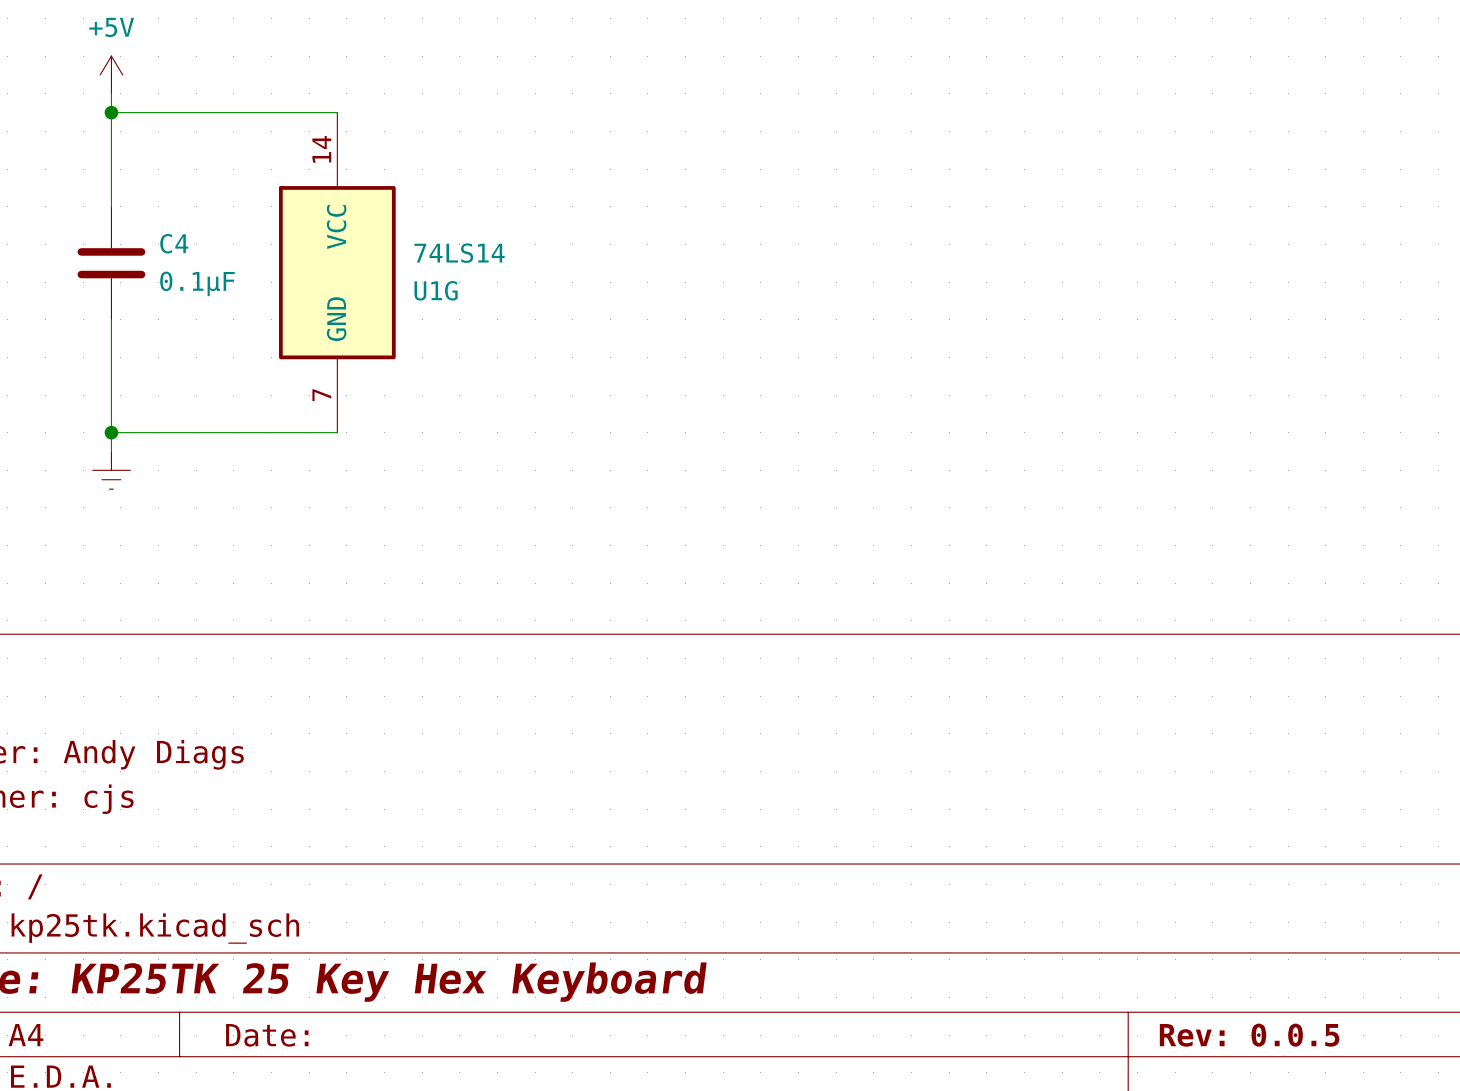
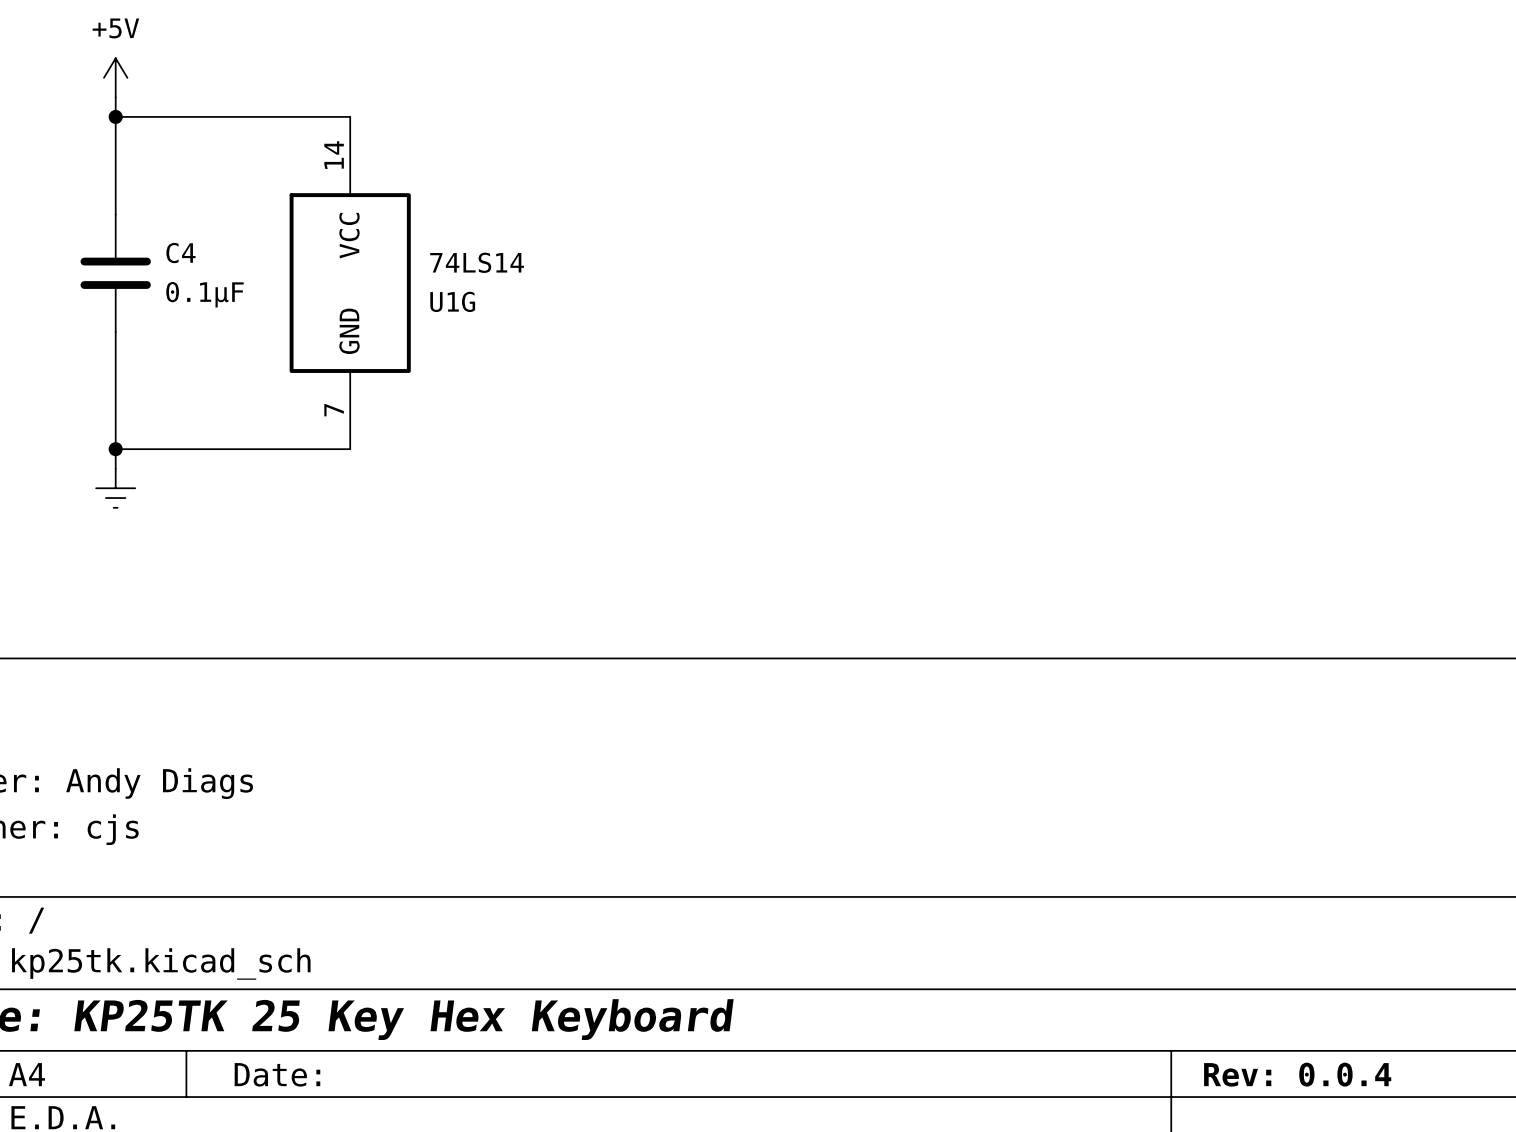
title block: Rev: 0.0.5 (1249, 1035) -> Rev: 0.0.4 (1297, 1074)

